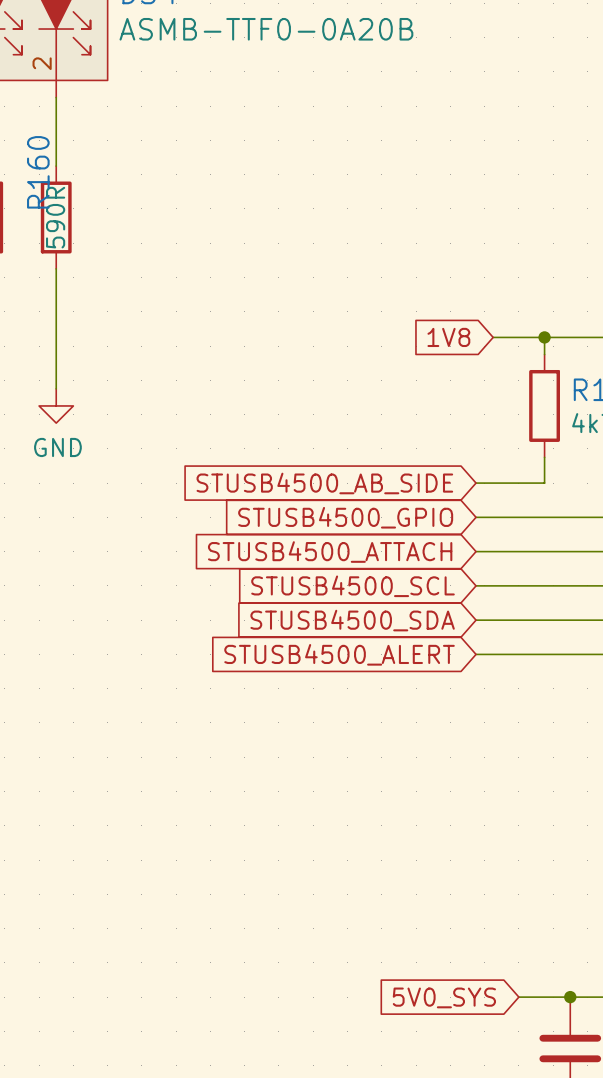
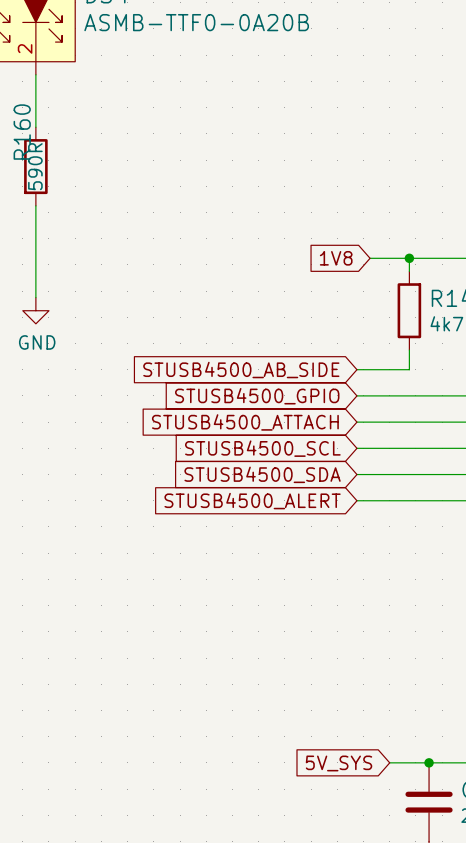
global label: 5V0_SYS (444, 997) -> 5V_SYS (339, 763)

